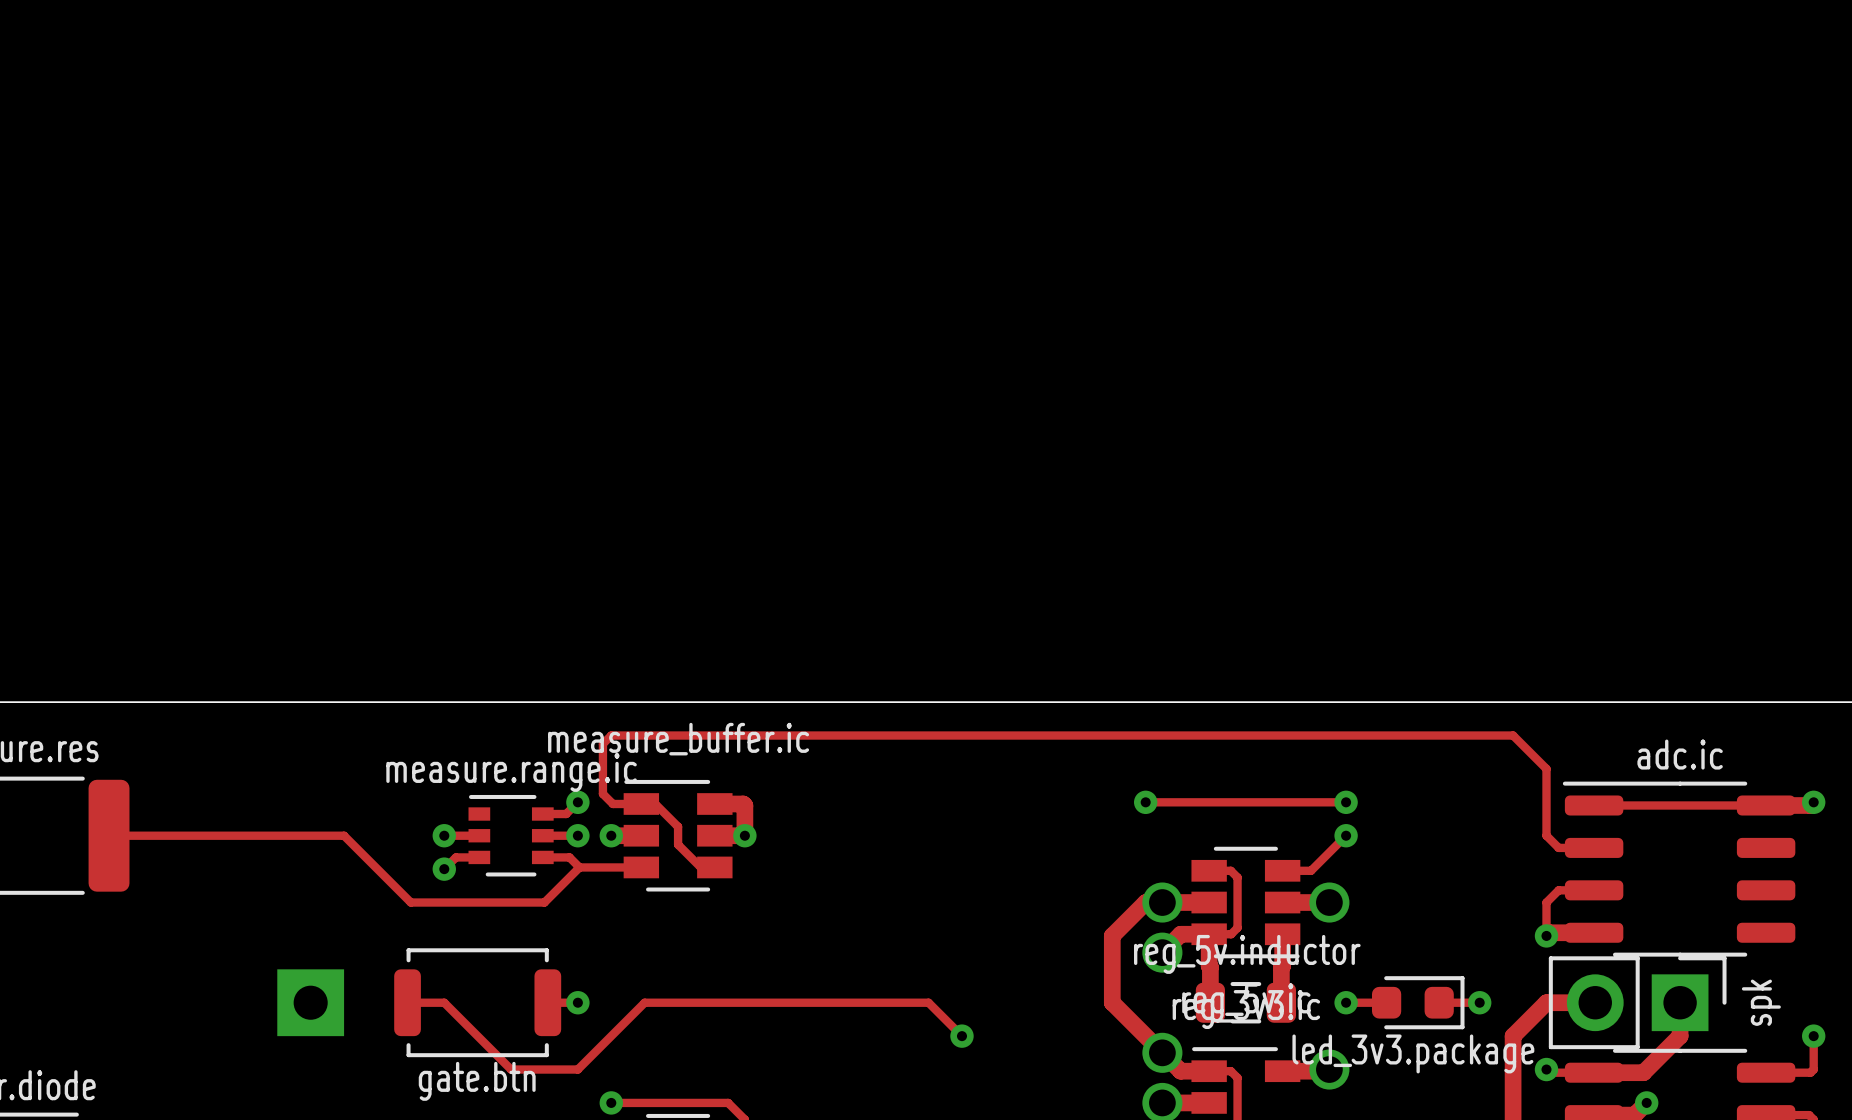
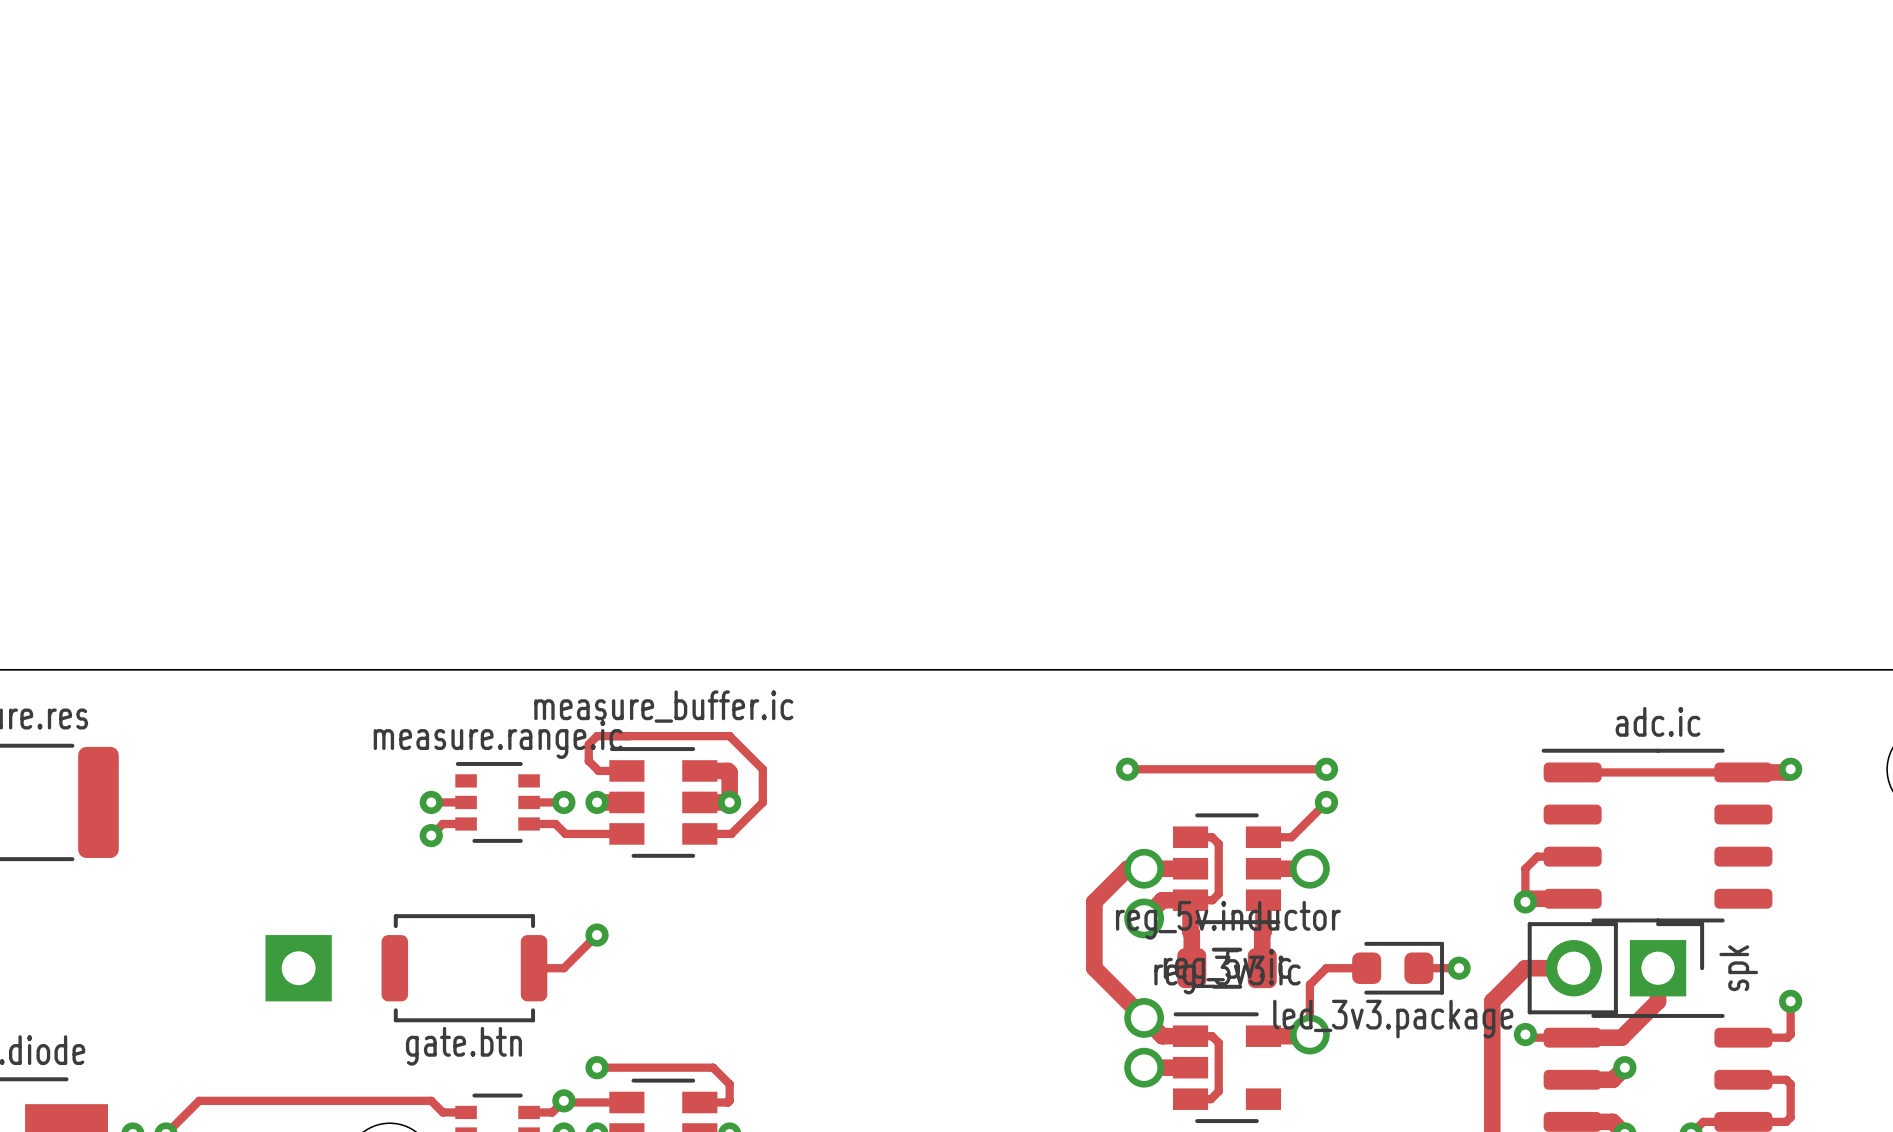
track: (602, 777) (602, 743) (611, 735) (1513, 735) (1546, 768) (1546, 835) (1558, 847) (1594, 847) -> none
track: (577, 802) (566, 814) (542, 814) -> none
via: (577, 802) -> none
track: (641, 803) (655, 803) (678, 826) (678, 844) (700, 867) (714, 867) -> (588, 744) (597, 736) (729, 736) (762, 769) (762, 802) (731, 833) (699, 833)
track: (109, 835) (344, 835) (410, 902) (544, 902) (579, 867) -> none
track: none -> (597, 935) (563, 968)
track: (407, 1002) (444, 1002) (511, 1069) (577, 1069) (644, 1002) (928, 1002) (961, 1036) -> none
via position: (577, 1002) -> (597, 935)
track: none -> (1326, 968) (1309, 984) (1309, 1034)
via: (1346, 1002) -> none
via: (961, 1036) -> none

